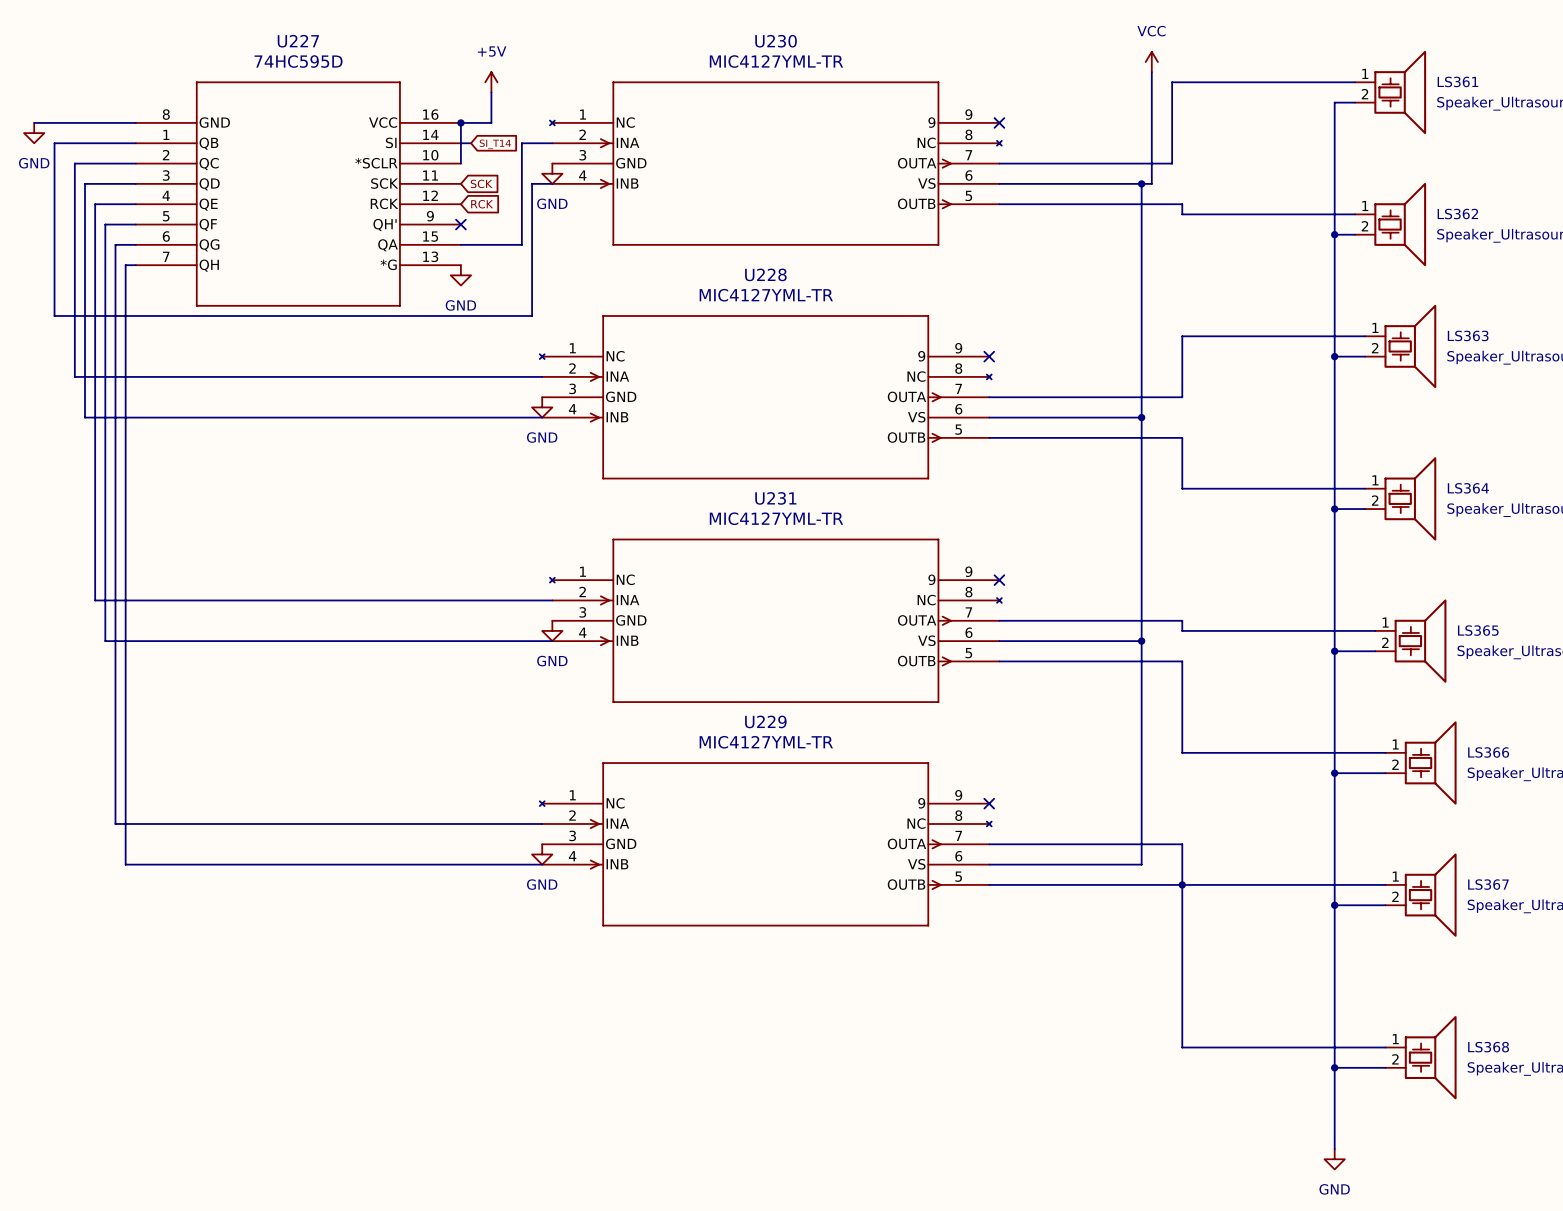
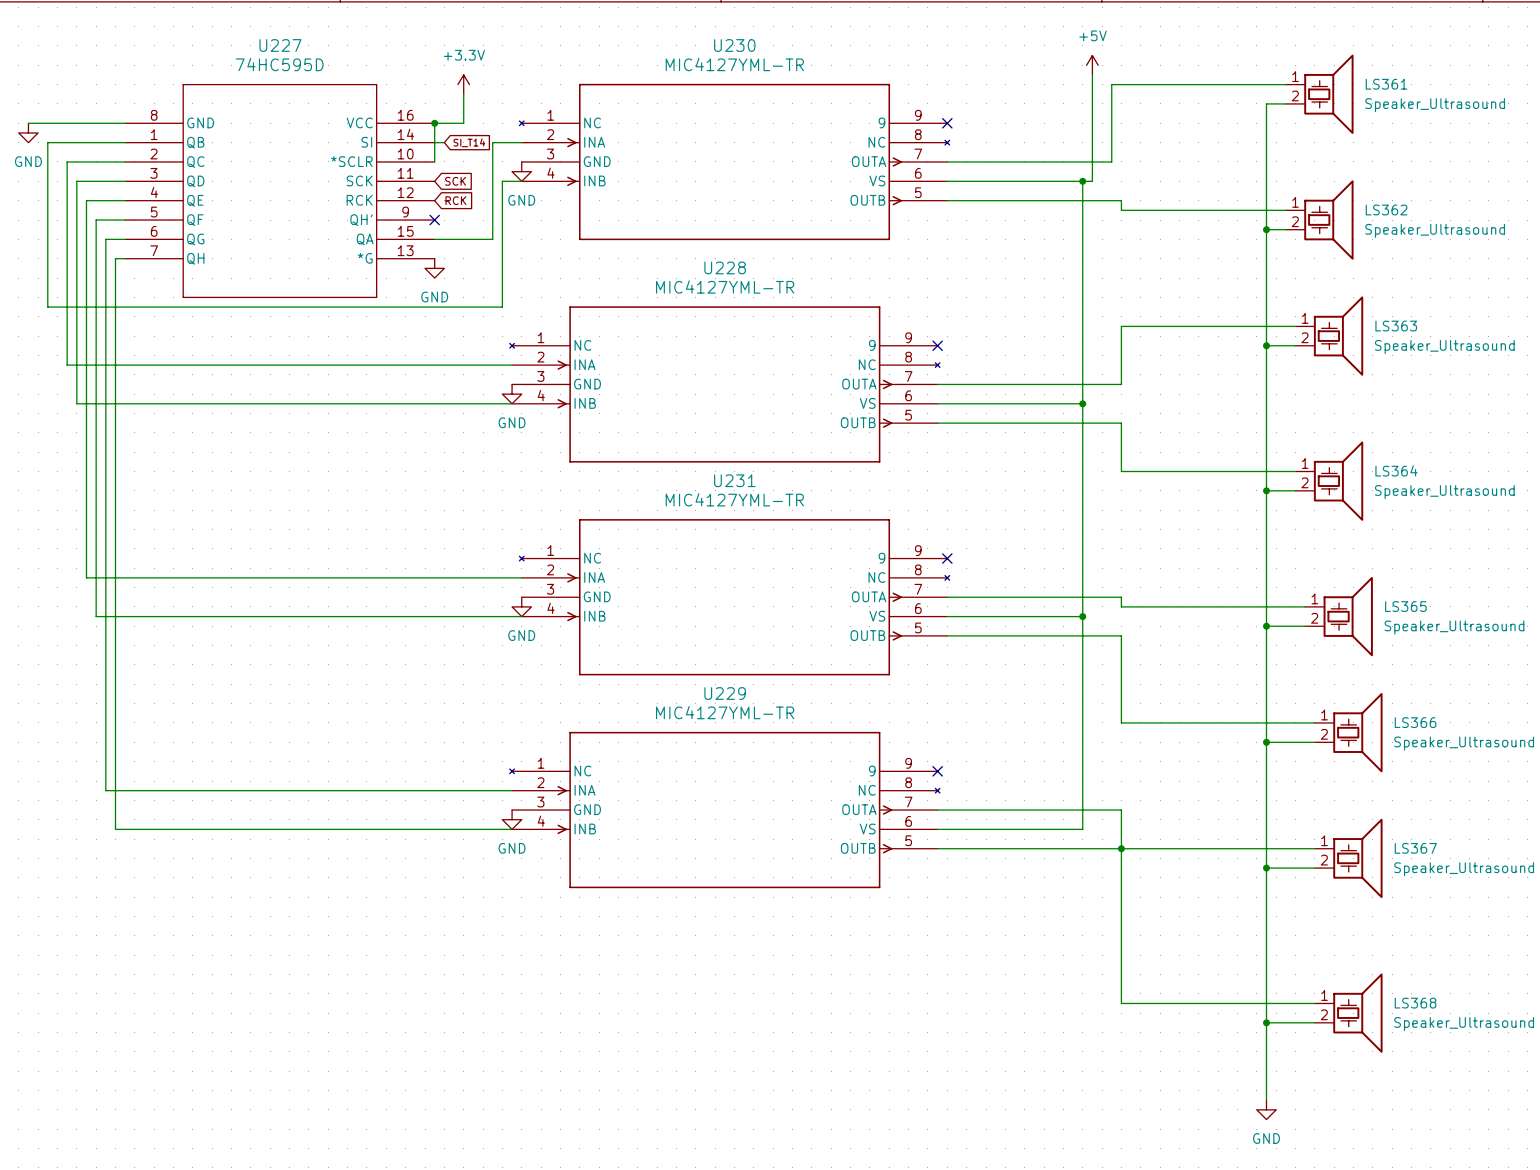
power symbol: VCC (1151, 61) -> +5V (1092, 65)
power symbol: +5V (491, 82) -> +3.3V (463, 84)

